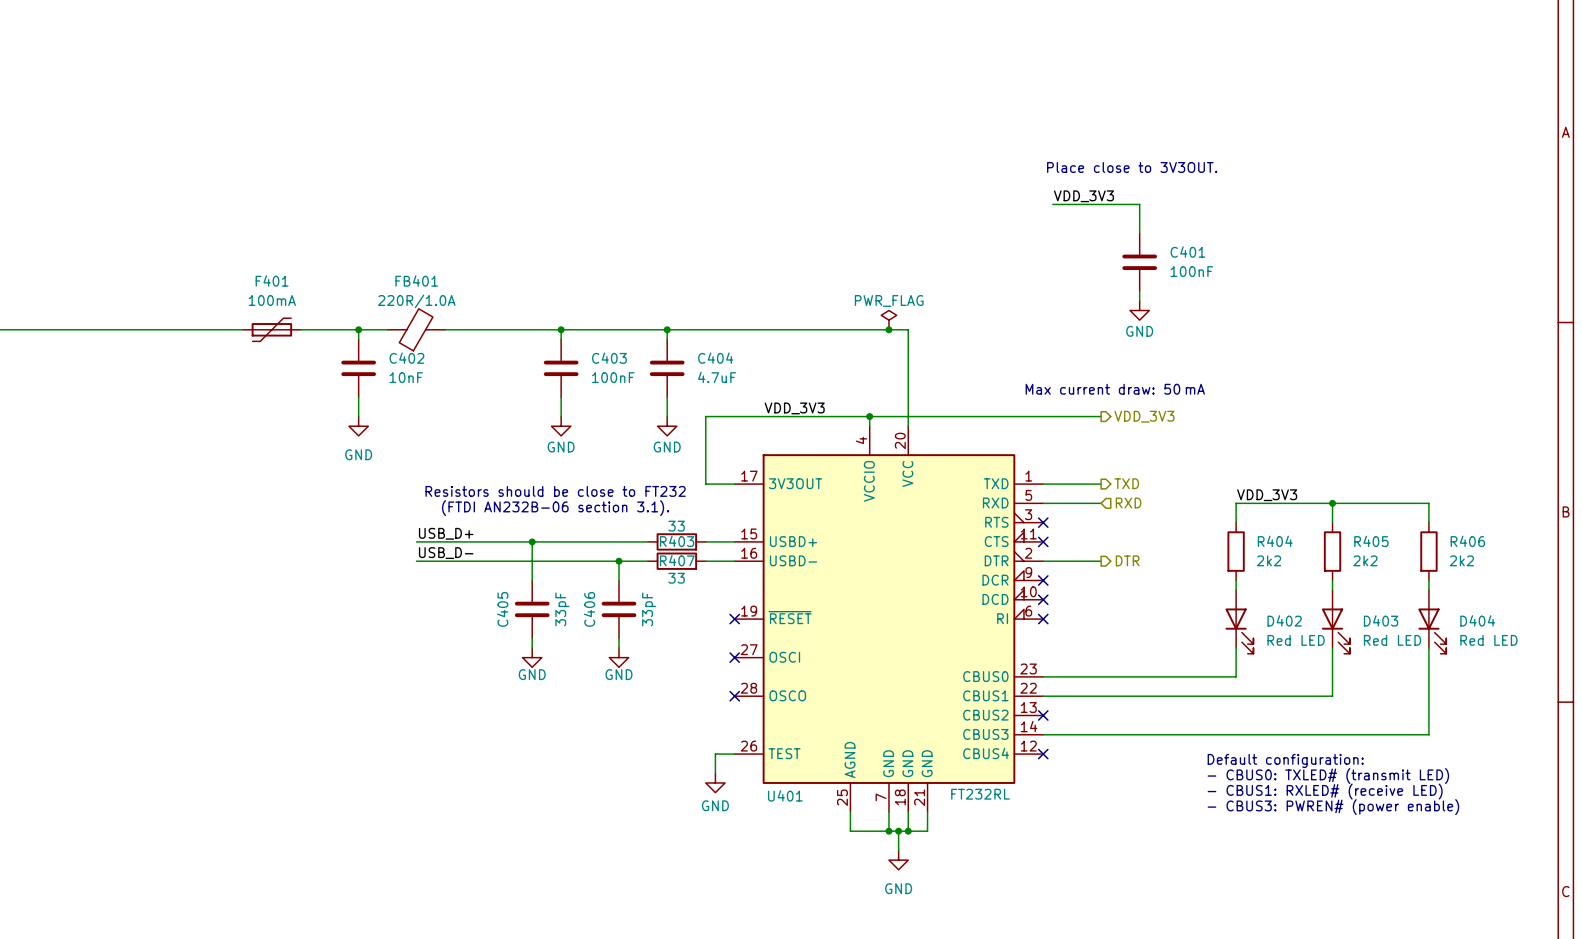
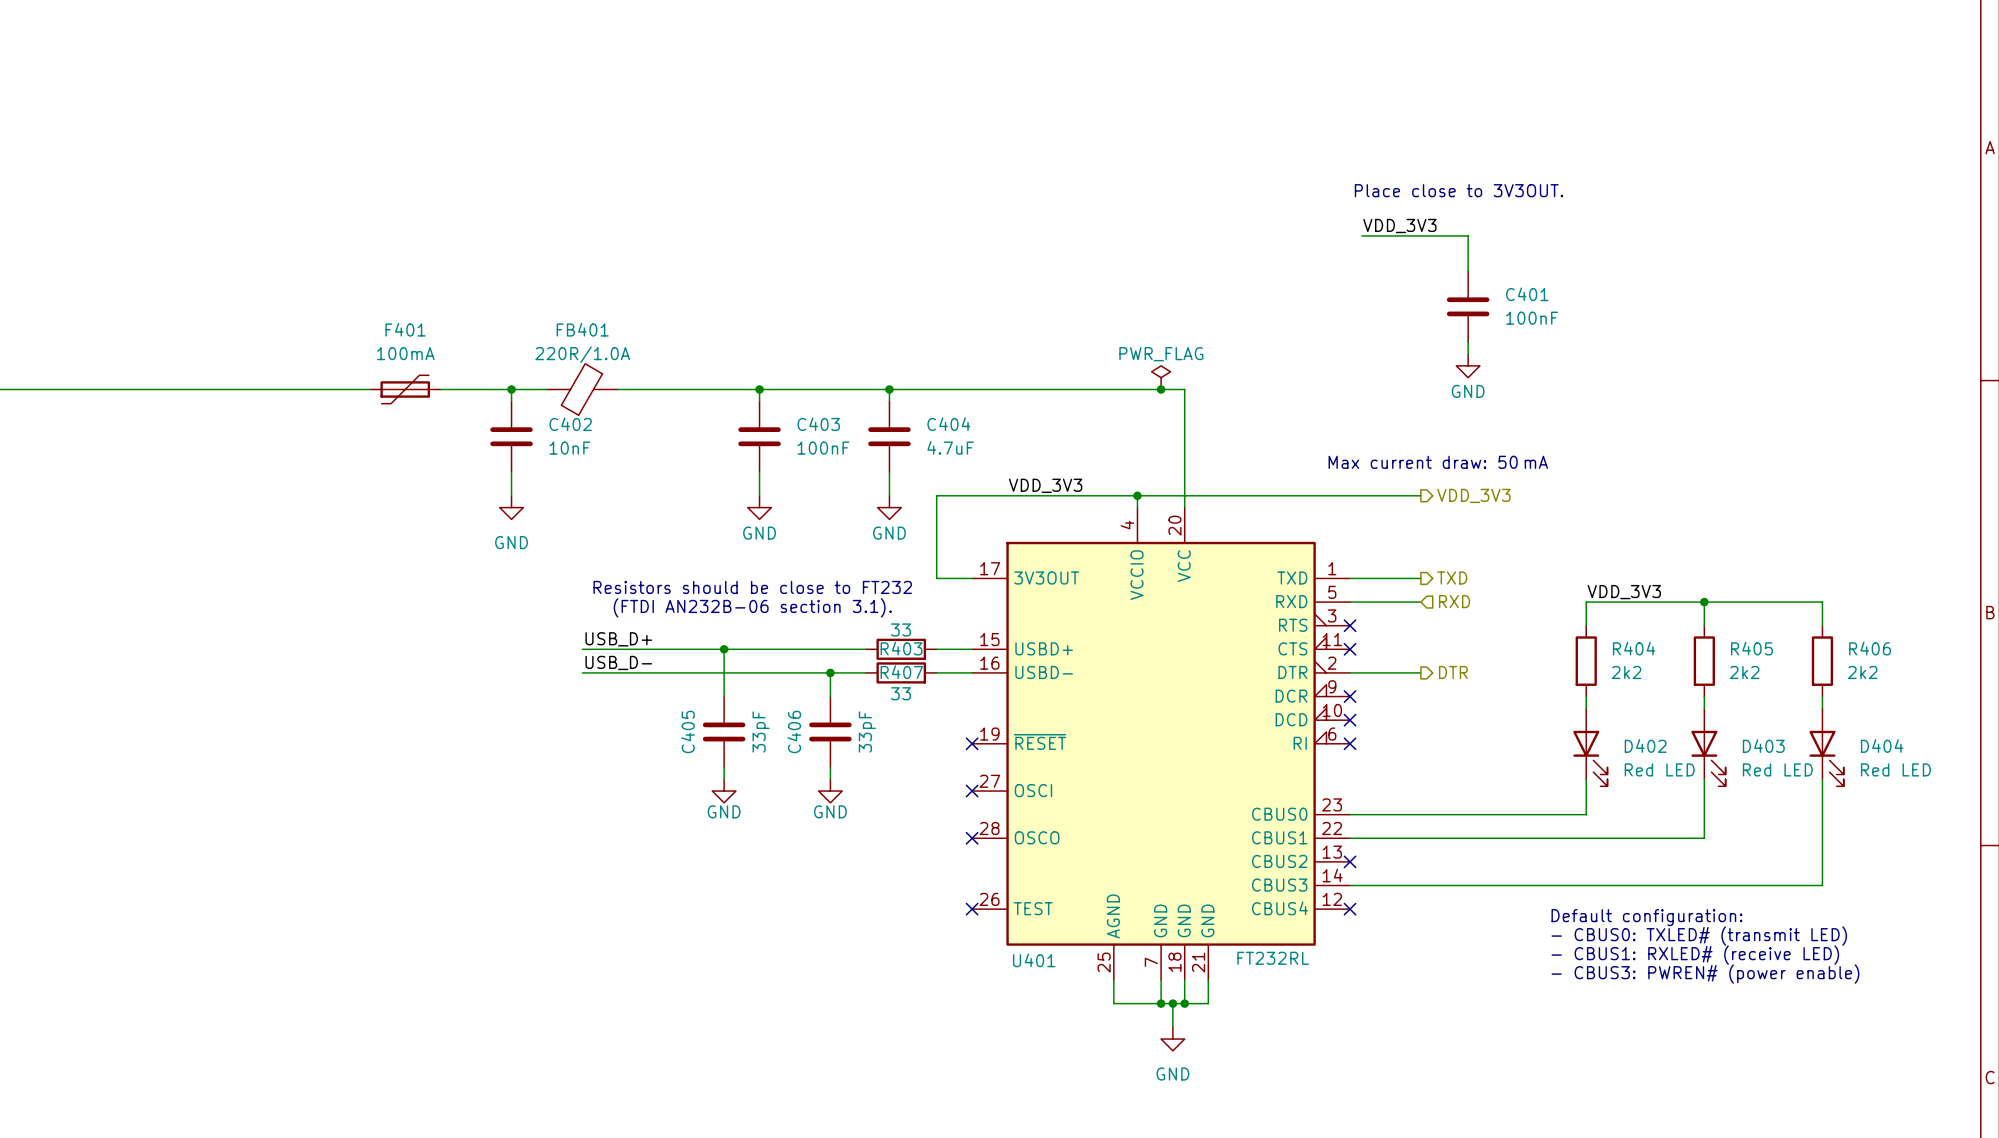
wire: (734, 754) (715, 754) (715, 773) -> none
no-connect mark: none -> (972, 909)
power symbol: GND (715, 782) -> none

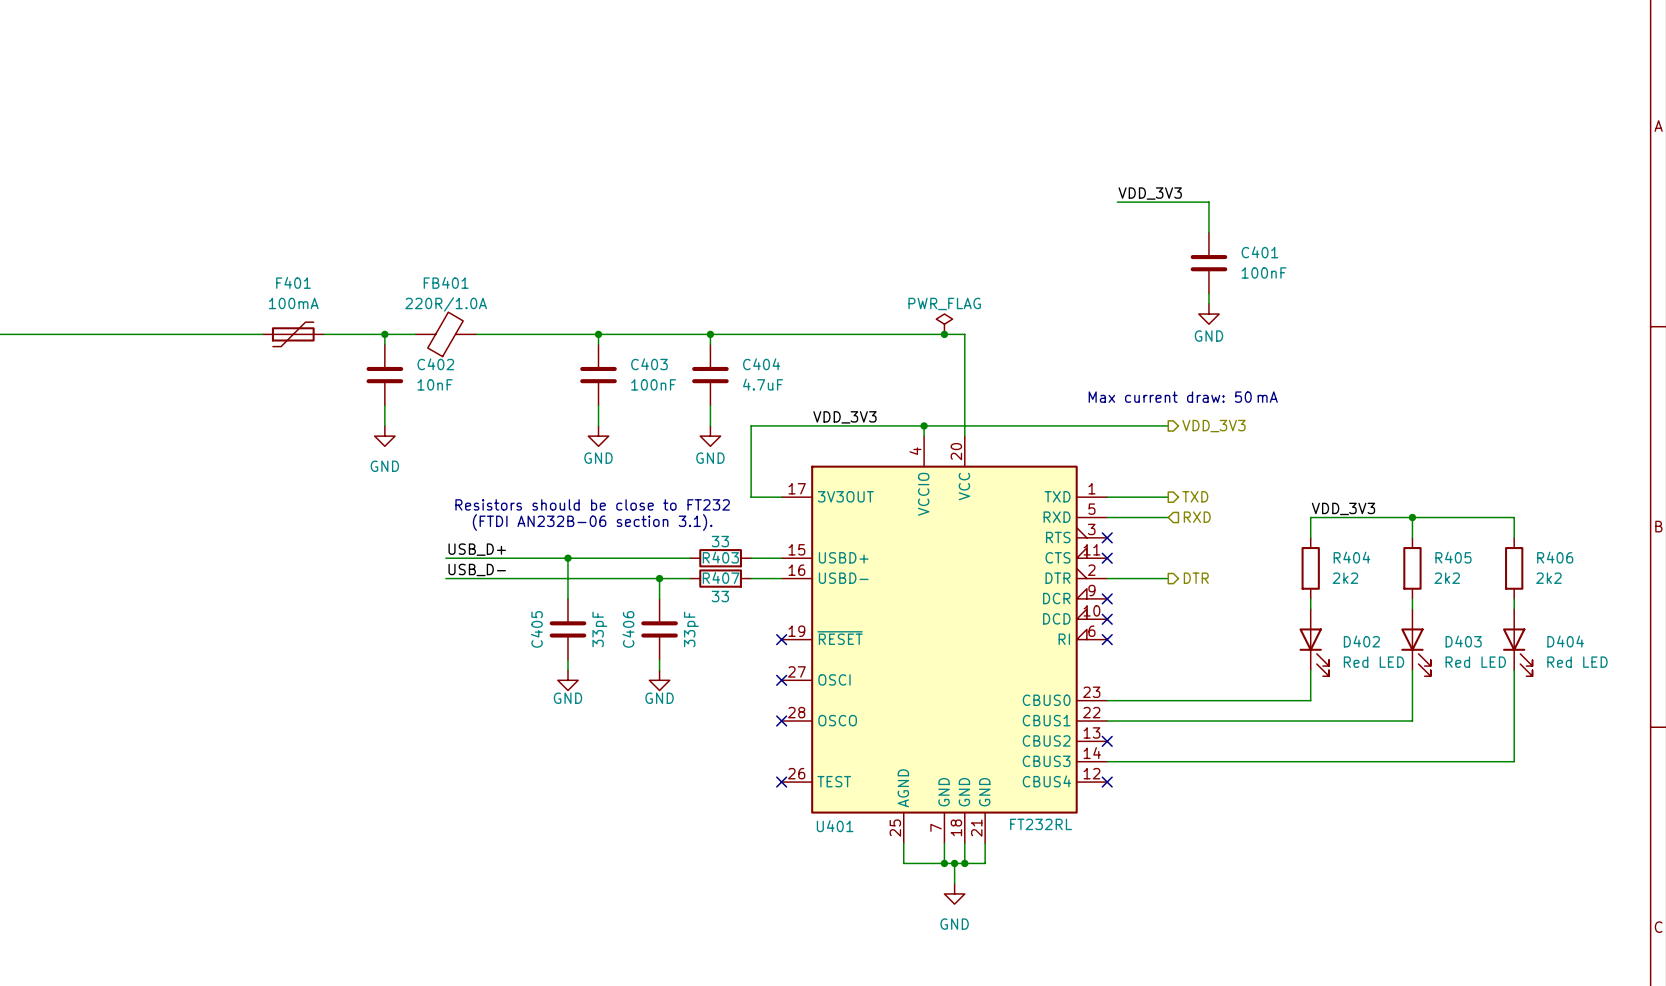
text: Place close to 3V3OUT. (1458, 190) -> none
text: Default configuration: (1646, 917) -> none
text: - CBUS0: TXLED# (transmit LED) (1699, 936) -> none
text: - CBUS1: RXLED# (receive LED) (1695, 955) -> none
text: - CBUS3: PWREN# (power enable) (1705, 974) -> none

